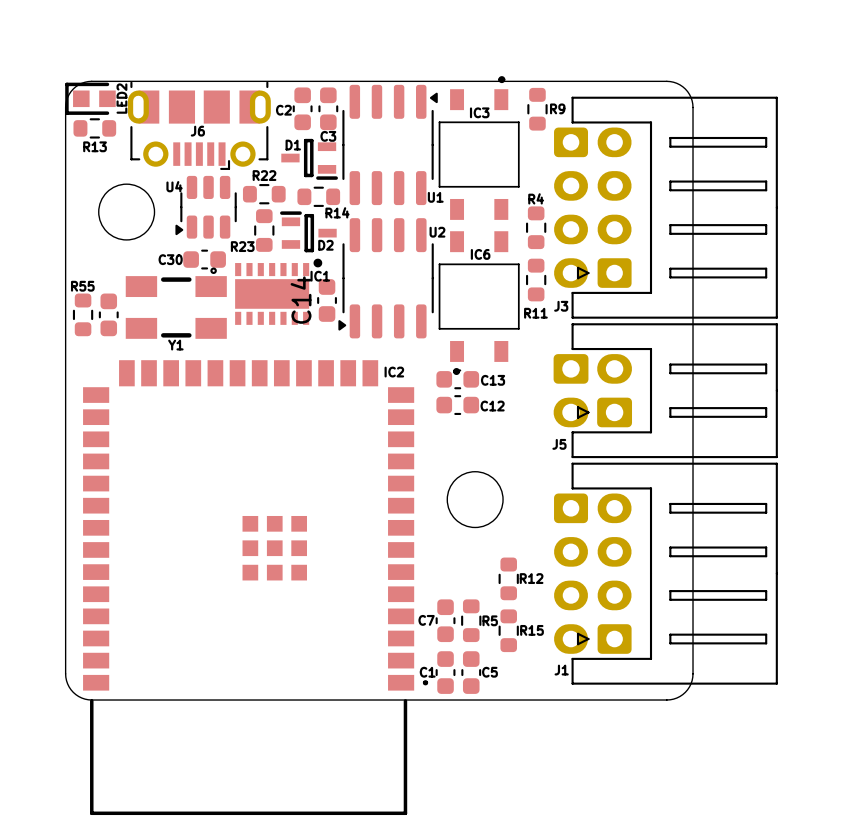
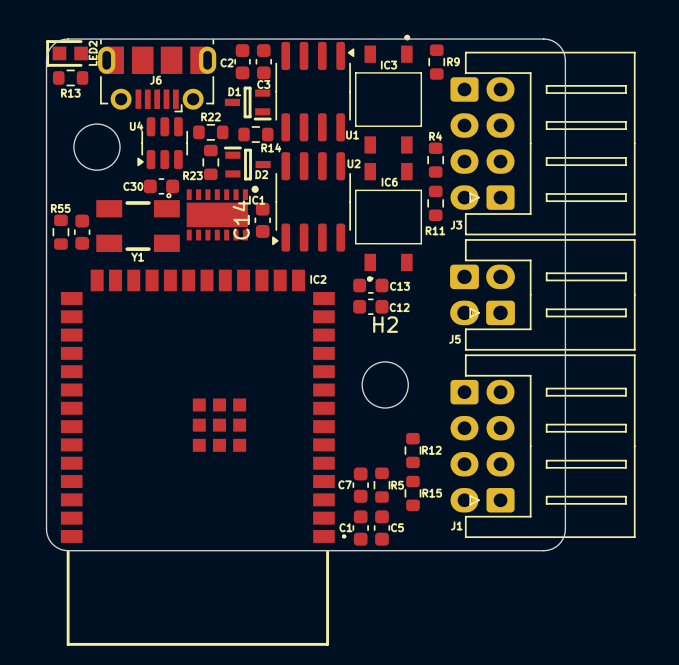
H2 name: none -> H2 (385, 324)

